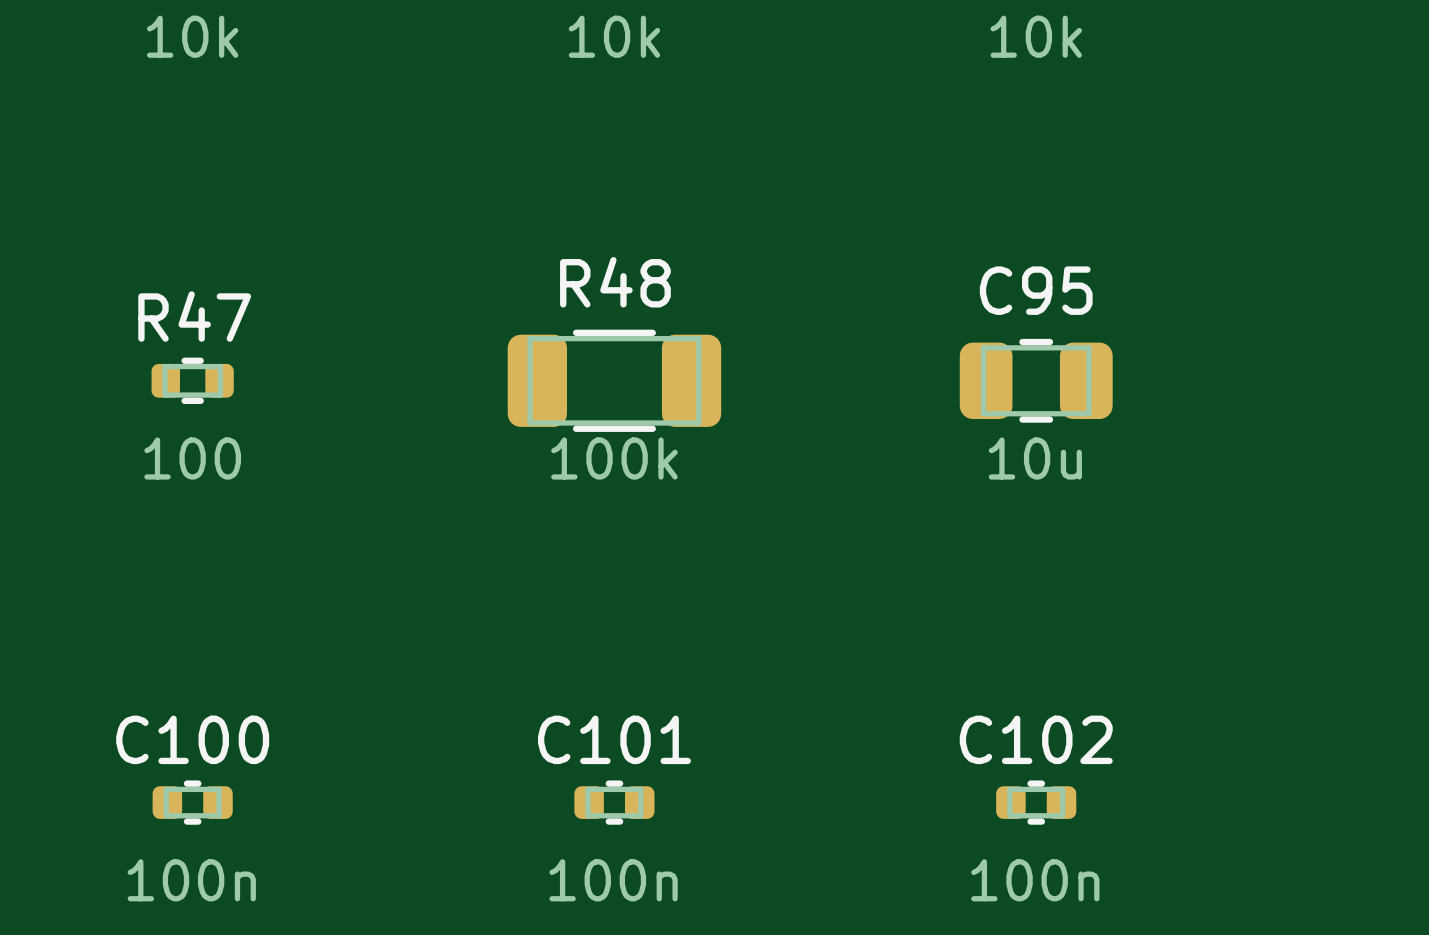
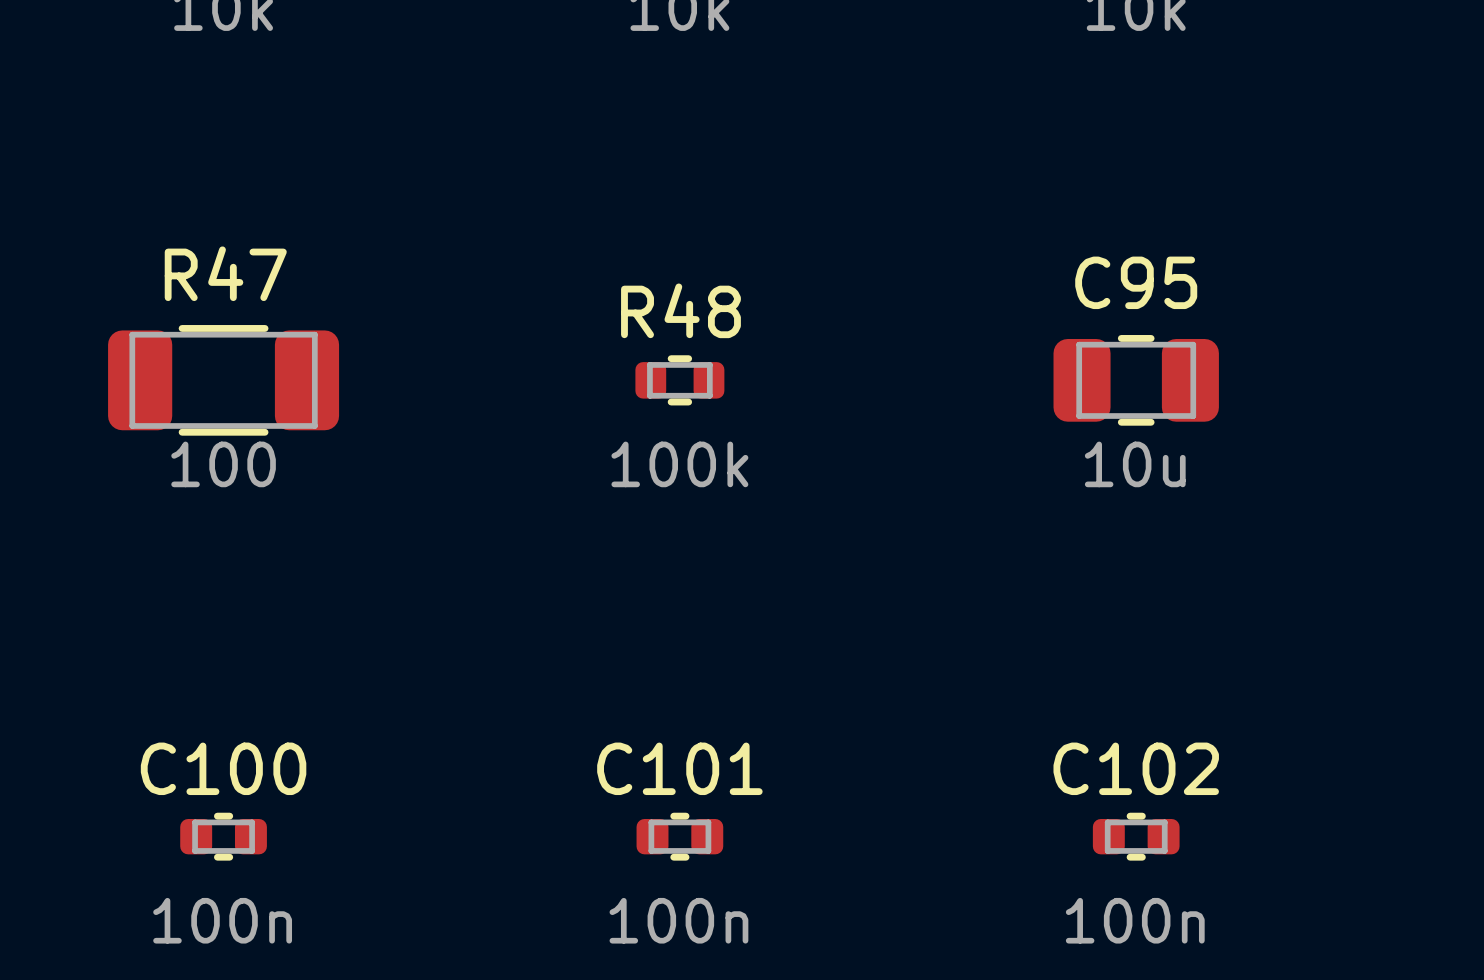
R48 footprint: [507, 329, 722, 432] -> [635, 355, 725, 406]
R47 footprint: [151, 357, 234, 405] -> [108, 325, 340, 436]

